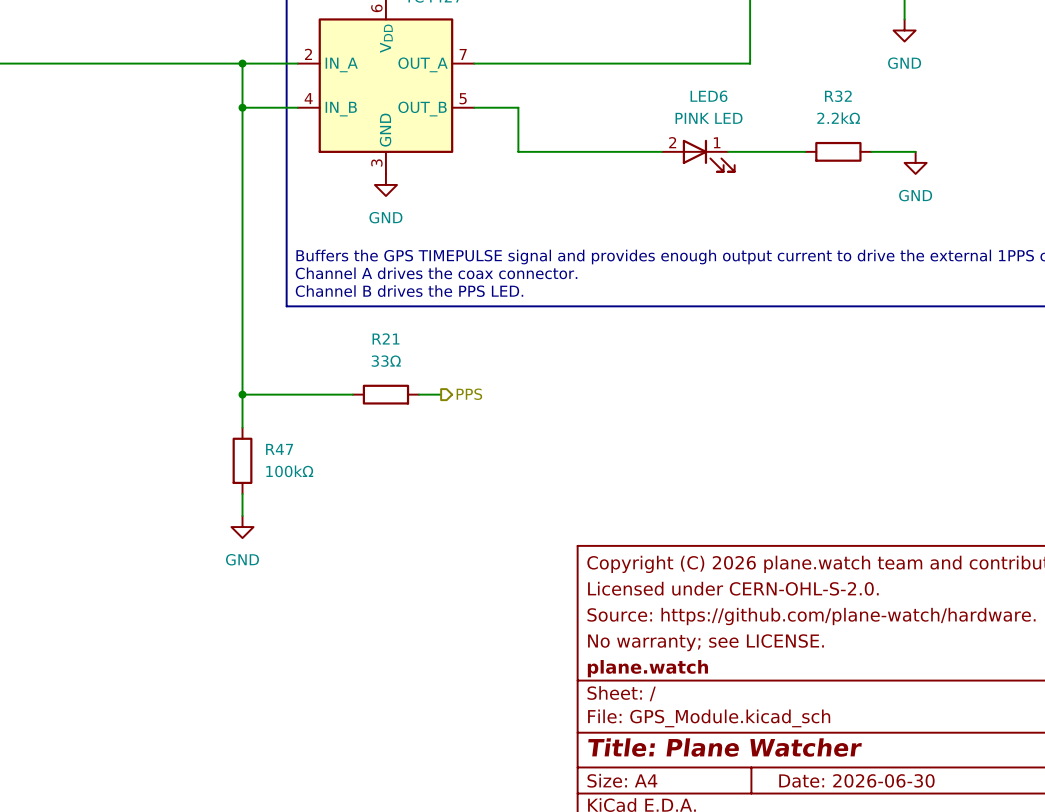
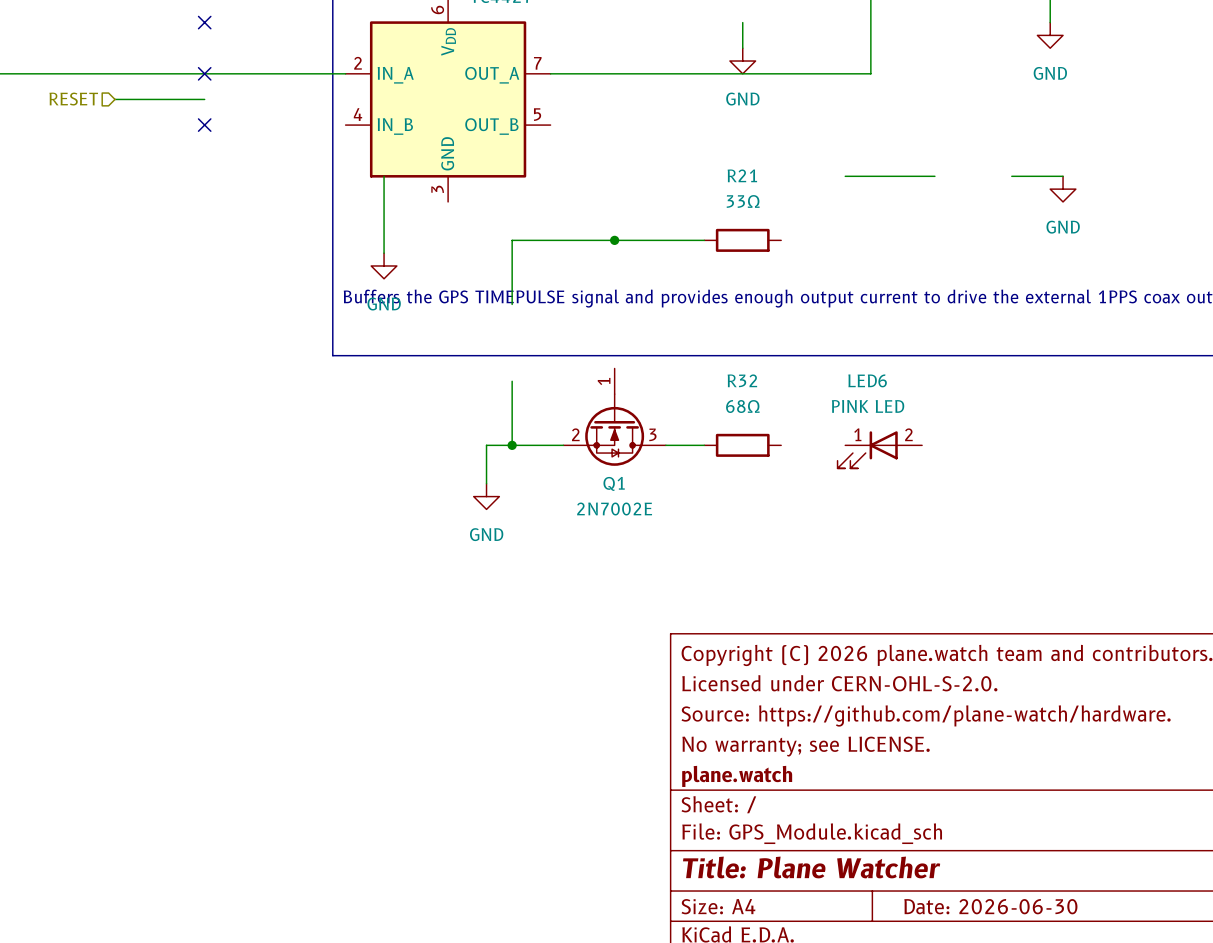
no-connect mark: none -> (204, 22)
wire: none -> (742, 22) (742, 48)
power symbol: none -> GND (742, 61)
no-connect mark: none -> (204, 73)
wire: (242, 63) (242, 427) -> none
junction: (242, 63) -> none
hierarchical label: none -> RESET (73, 99)
wire: none -> (115, 99) (204, 99)
no-connect mark: none -> (204, 125)
wire: (242, 107) (297, 107) -> none
junction: (242, 107) -> none
wire: (474, 107) (518, 107) (518, 151) (661, 151) -> none
R32 value: 2.2kΩ (838, 118) -> 68Ω (742, 406)
wire: none -> (384, 176) (384, 253)
R32 position: (838, 151) -> (742, 445)
LED6 position: (698, 155) -> (879, 449)
LED6 flip: as is (708, 155) -> left-right (867, 449)
power symbol position: GND (385, 184) -> GND (384, 265)
junction: none -> (614, 240)
wire: none -> (704, 240) (512, 240) (512, 304)
text: Channel A drives the coax connector. (436, 273) -> none
text: Channel B drives the PPS LED. (409, 291) -> none
wire: none -> (512, 381) (512, 445)
Q1: none -> 2N7002E (614, 417)
junction: none -> (512, 445)
wire: none -> (563, 445) (486, 445) (486, 483)
wire: none -> (665, 445) (704, 445)
wire: (242, 394) (352, 394) -> none
junction: (242, 394) -> none
R21 position: (385, 394) -> (742, 240)
wire: (419, 394) (441, 394) -> none
hierarchical label: PPS (469, 394) -> none
power symbol: none -> GND (486, 496)
R47: 100kΩ (242, 460) -> none
wire: (242, 493) (242, 516) -> none
power symbol: GND (242, 527) -> none

